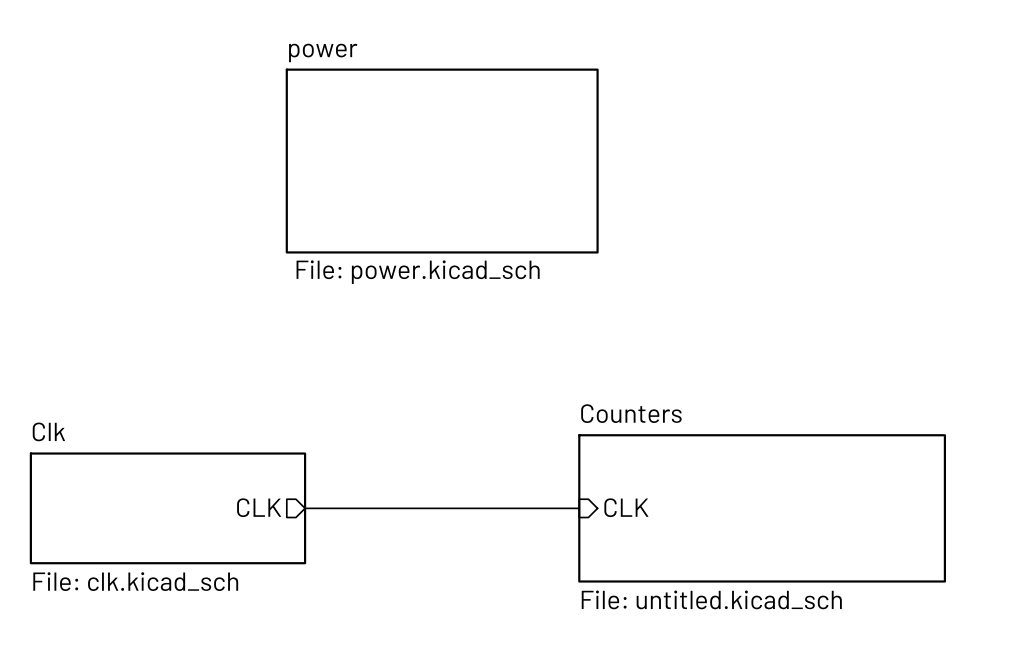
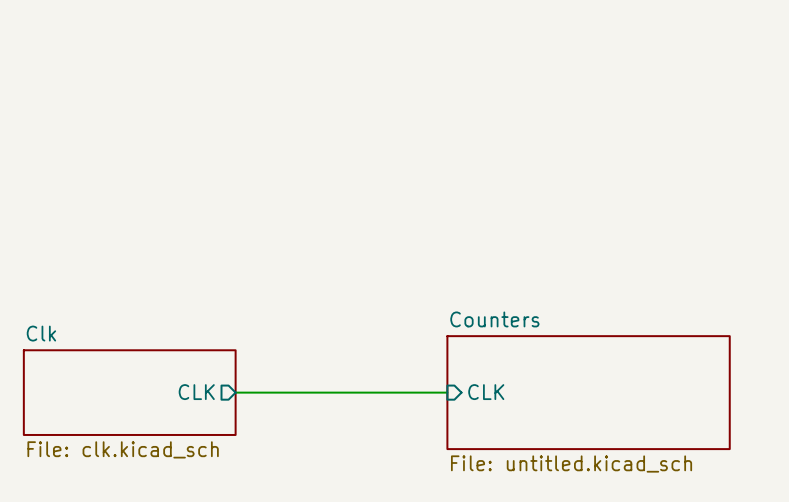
sheet power: File: power.kicad_sch (442, 161) -> none

